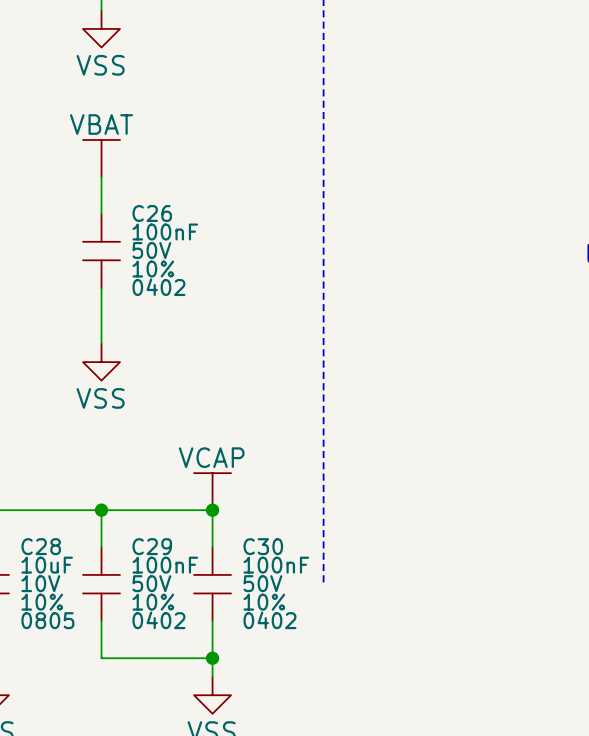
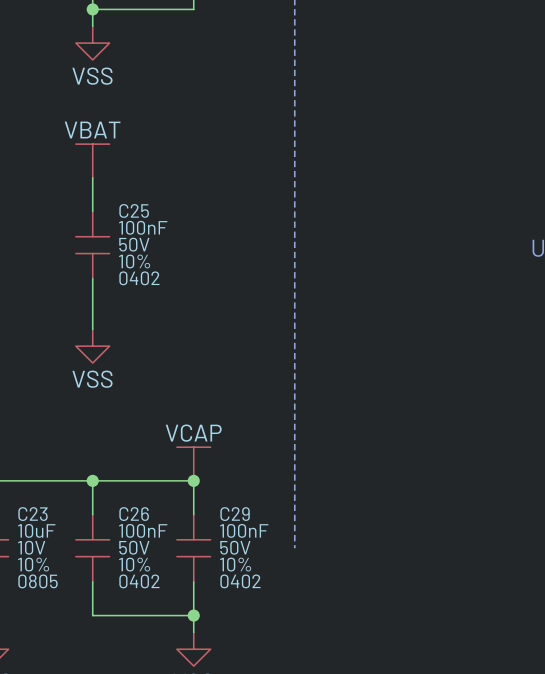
C26 name: C26 (152, 213) -> C25 (134, 210)
C28 name: C28 (41, 546) -> C23 (32, 514)
C29 name: C29 (152, 546) -> C26 (134, 514)
C30 name: C30 (263, 546) -> C29 (235, 514)

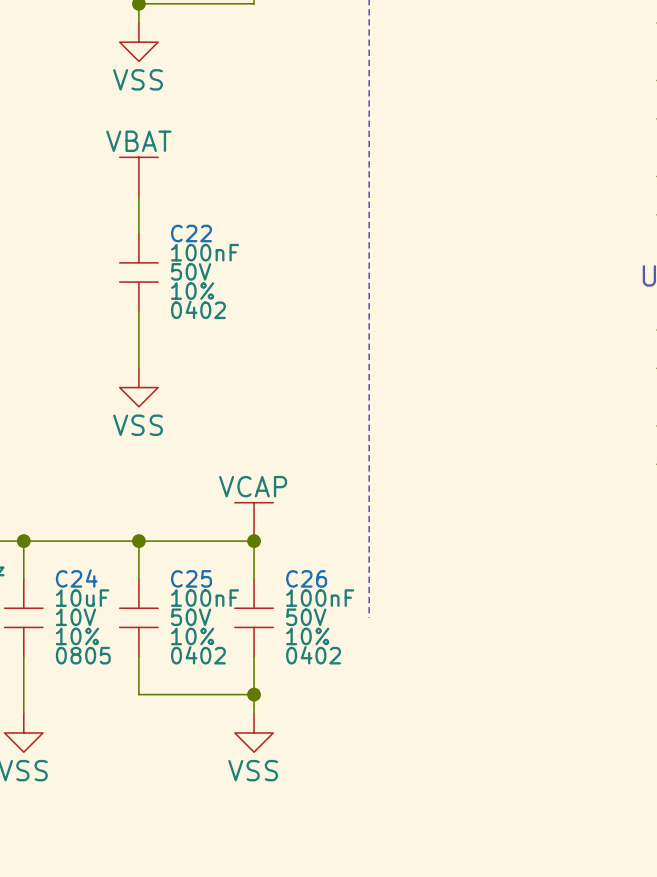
C25 name: C25 (134, 210) -> C22 (191, 233)
C23 name: C23 (32, 514) -> C24 (76, 578)
C26 name: C26 (134, 514) -> C25 (191, 578)
C29 name: C29 (235, 514) -> C26 (306, 578)

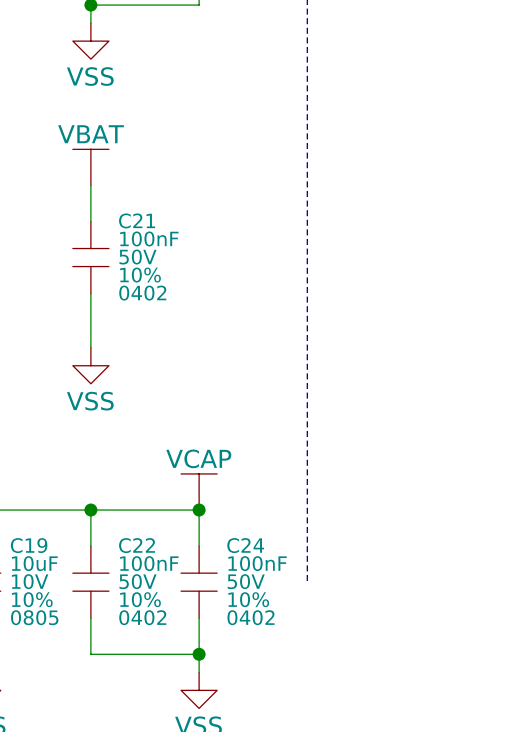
C22 name: C22 (191, 233) -> C21 (137, 220)
C24 name: C24 (76, 578) -> C19 (29, 545)
C25 name: C25 (191, 578) -> C22 (137, 545)
C26 name: C26 (306, 578) -> C24 (245, 545)

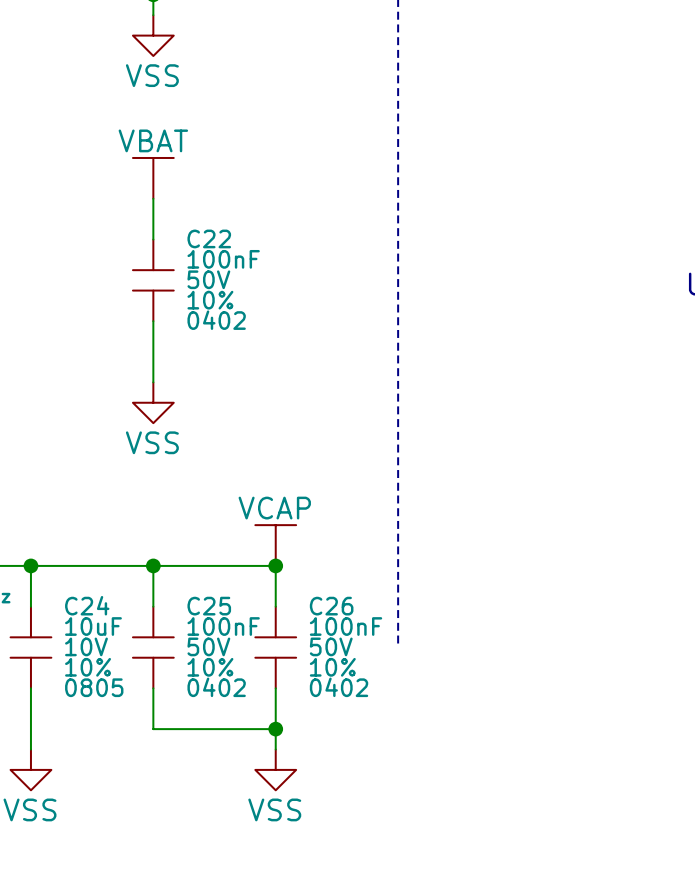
C21 name: C21 (137, 220) -> C22 (209, 238)
C19 name: C19 (29, 545) -> C24 (87, 605)
C22 name: C22 (137, 545) -> C25 (209, 606)
C24 name: C24 (245, 545) -> C26 (331, 606)

